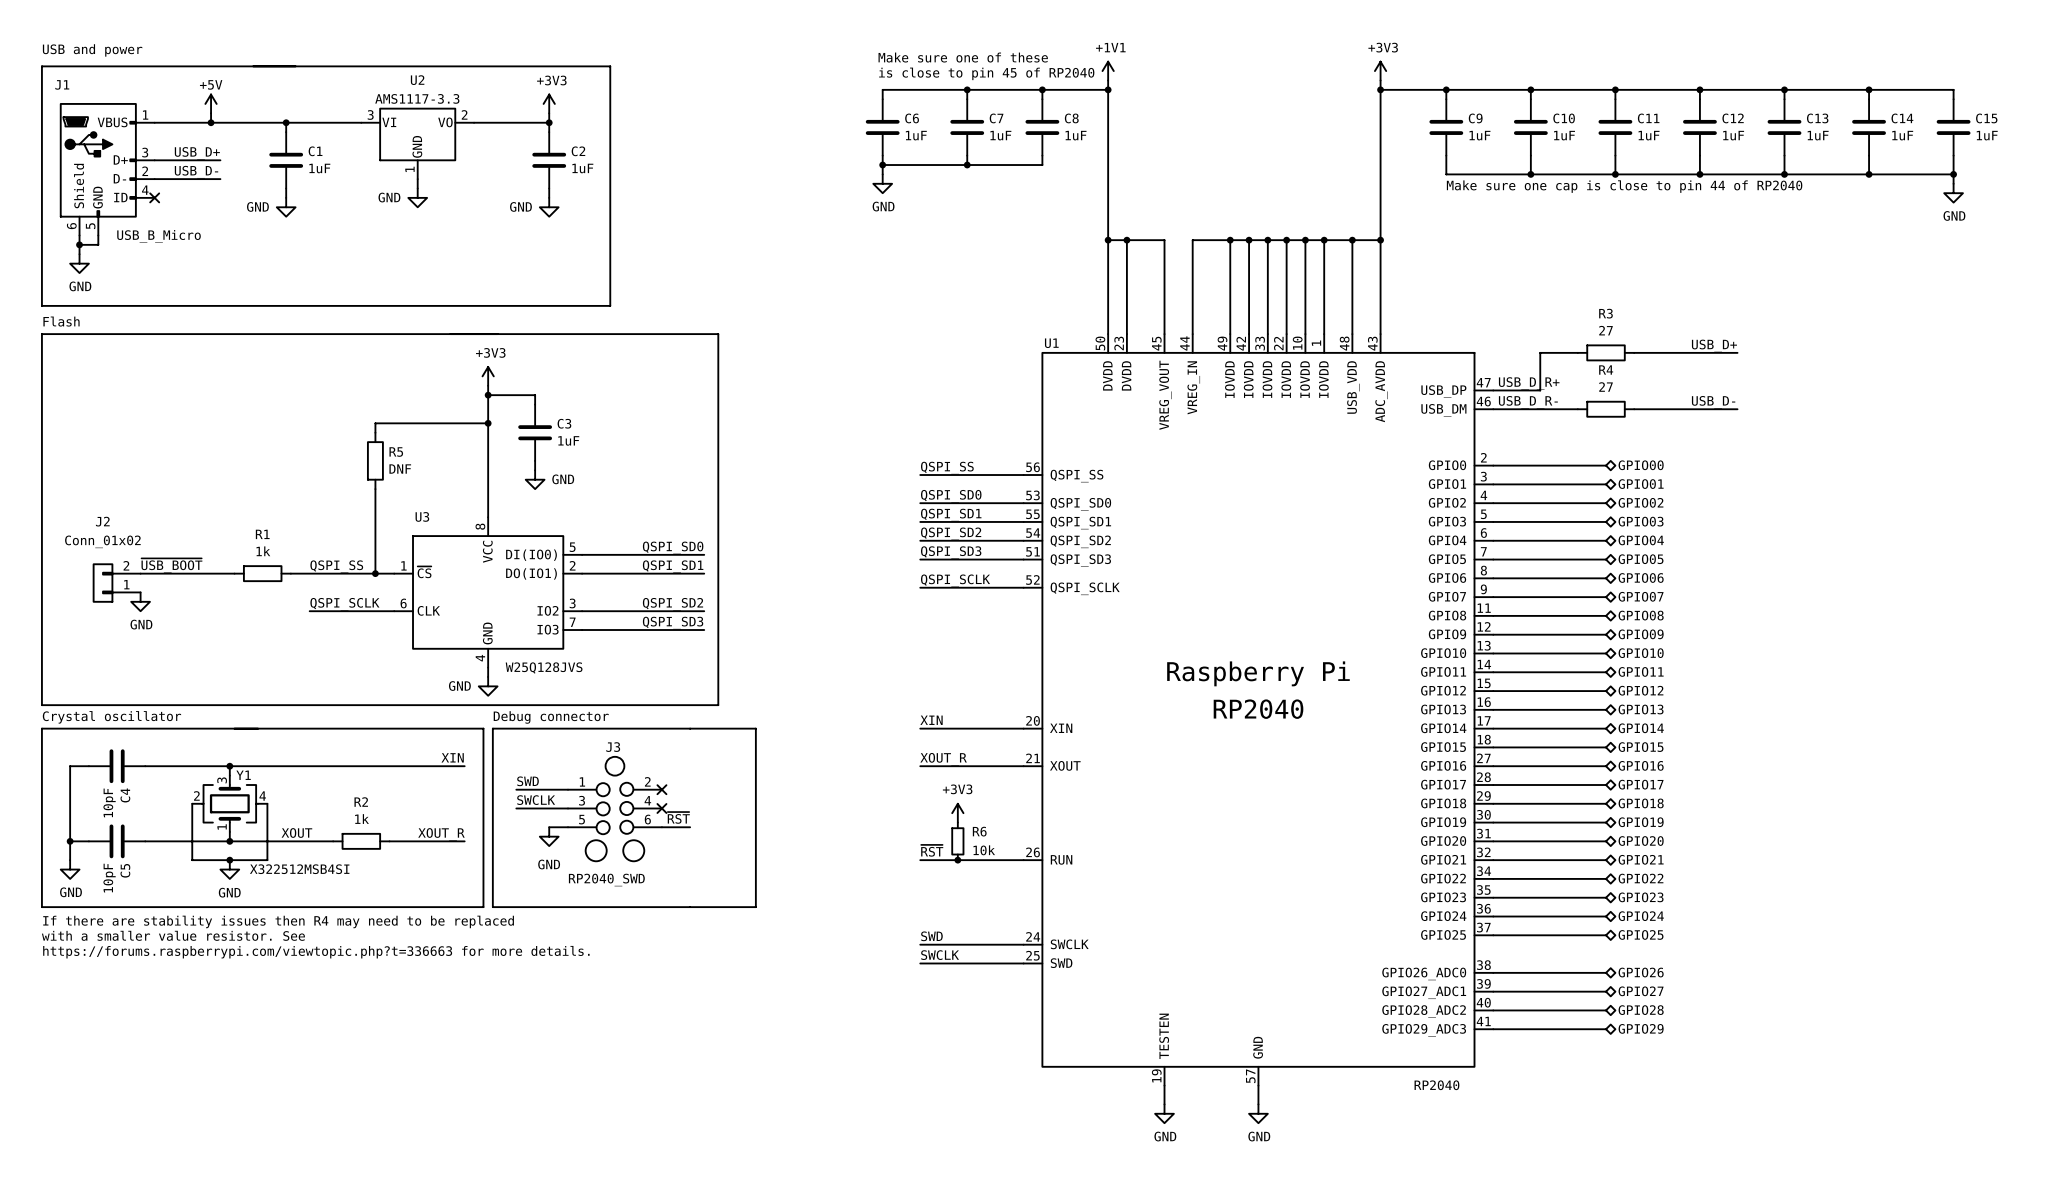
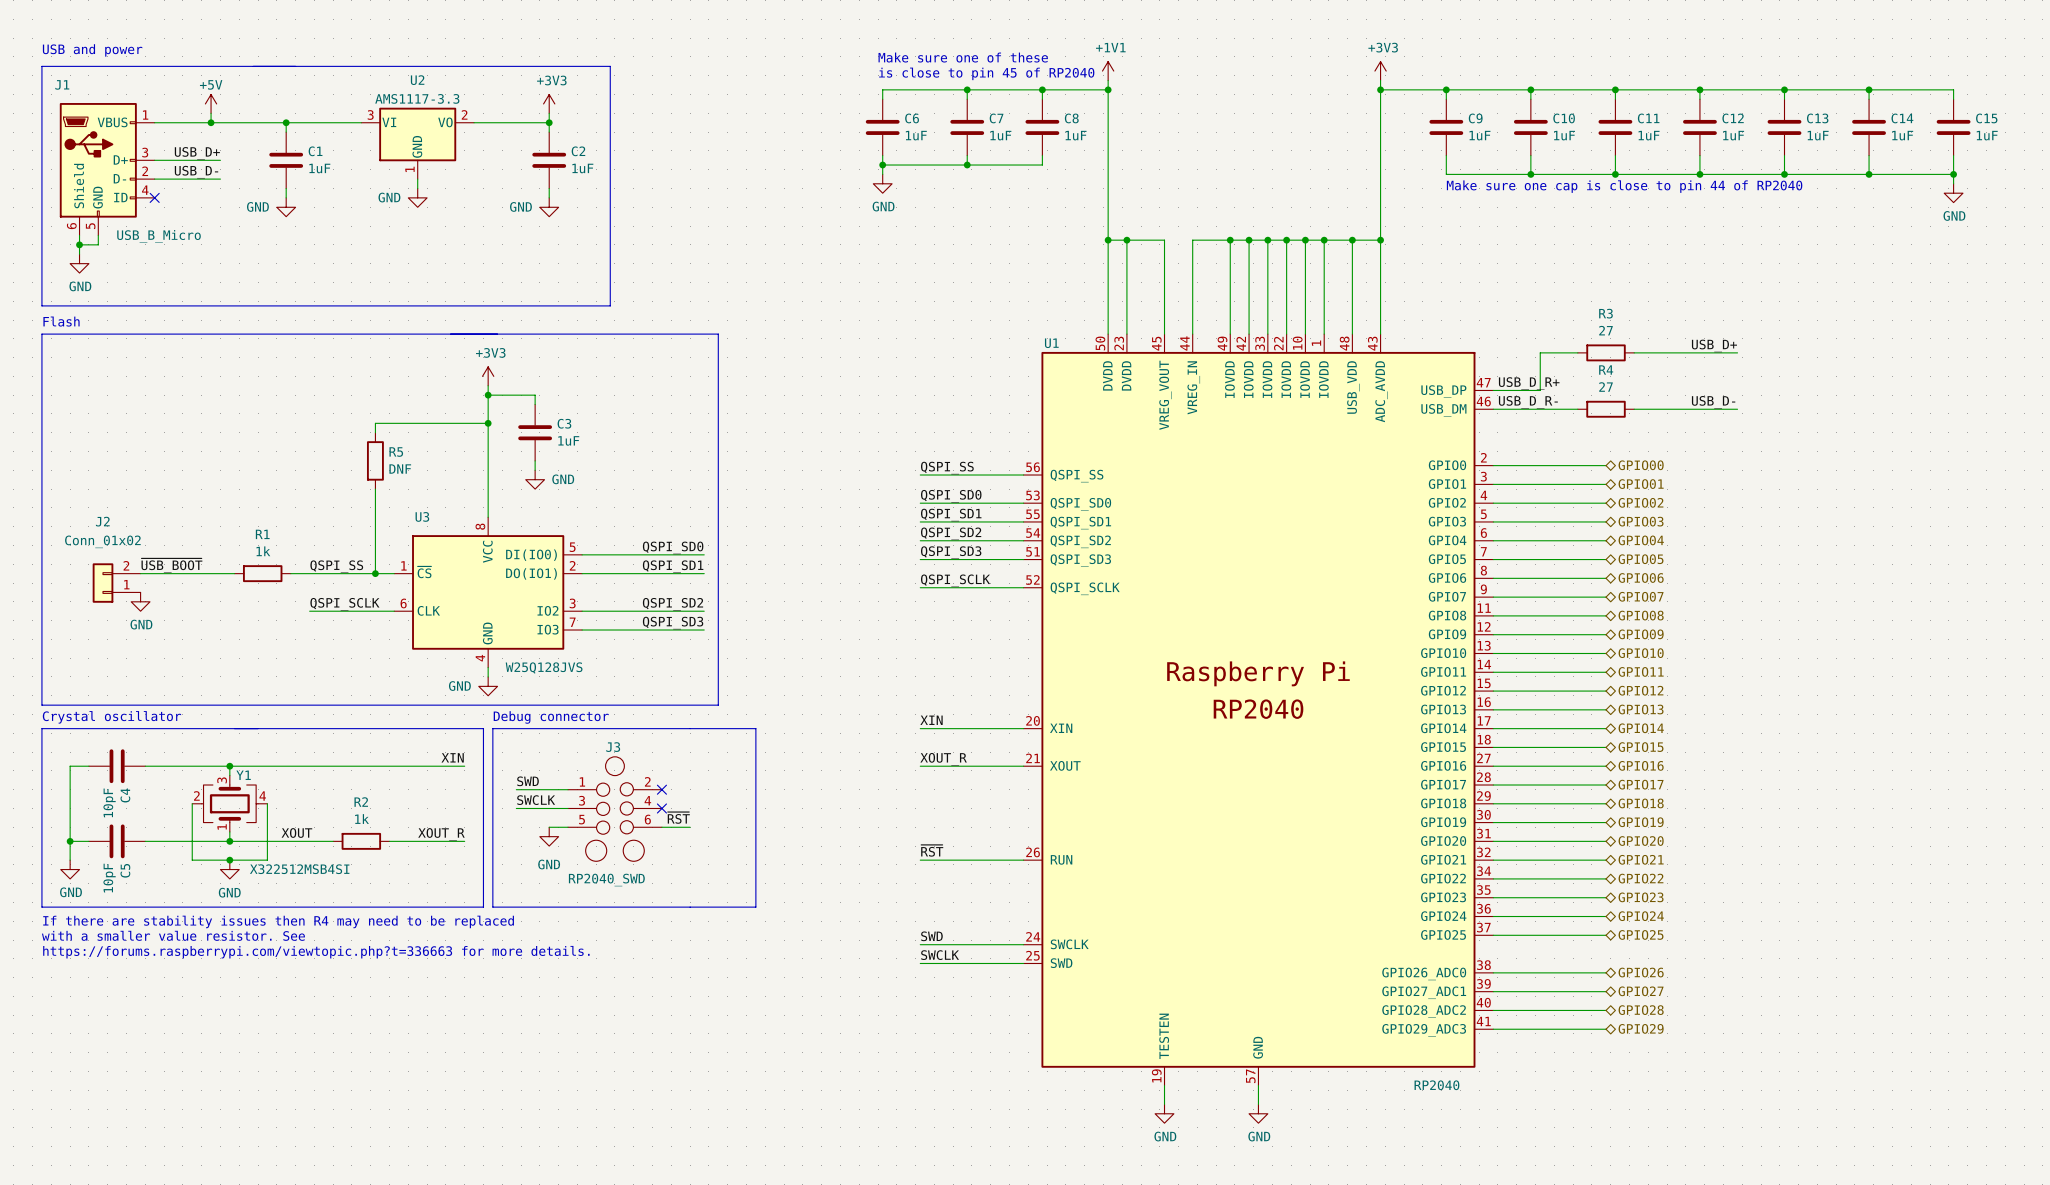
power symbol: +3V3 (957, 813) -> none
R6: 10k (957, 841) -> none
junction: (957, 860) -> none

